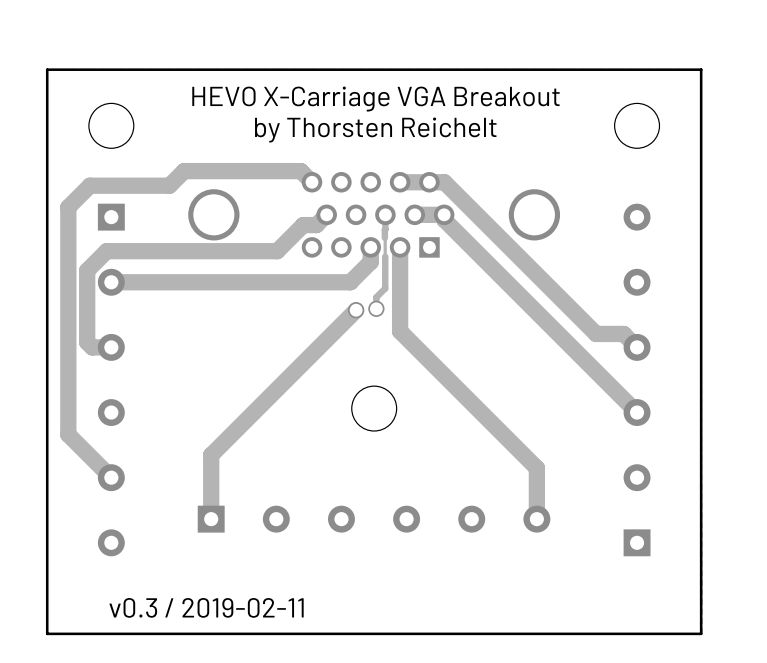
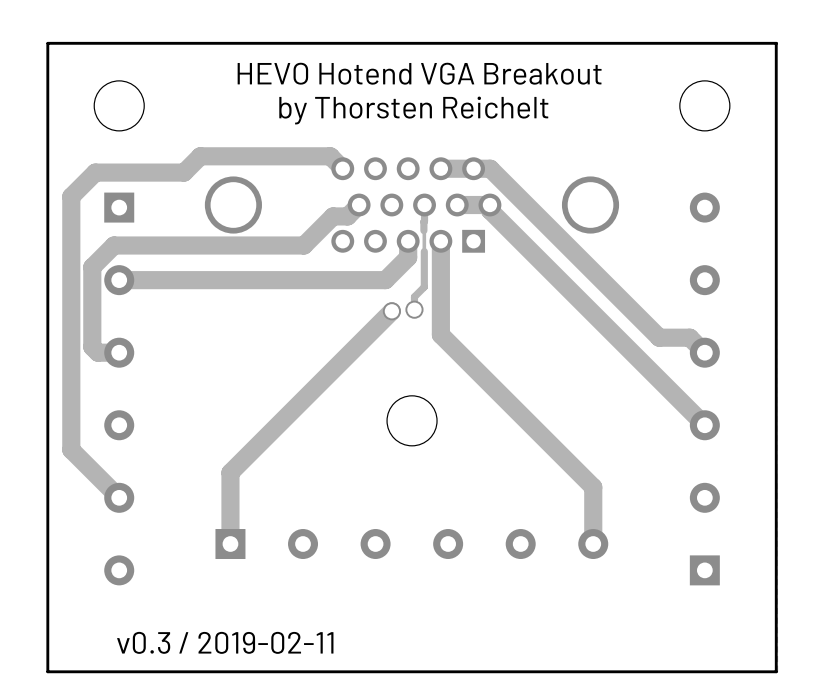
text: HEVO X-Carriage VGA Breakout (375, 99) -> HEVO Hotend VGA Breakout (419, 73)

